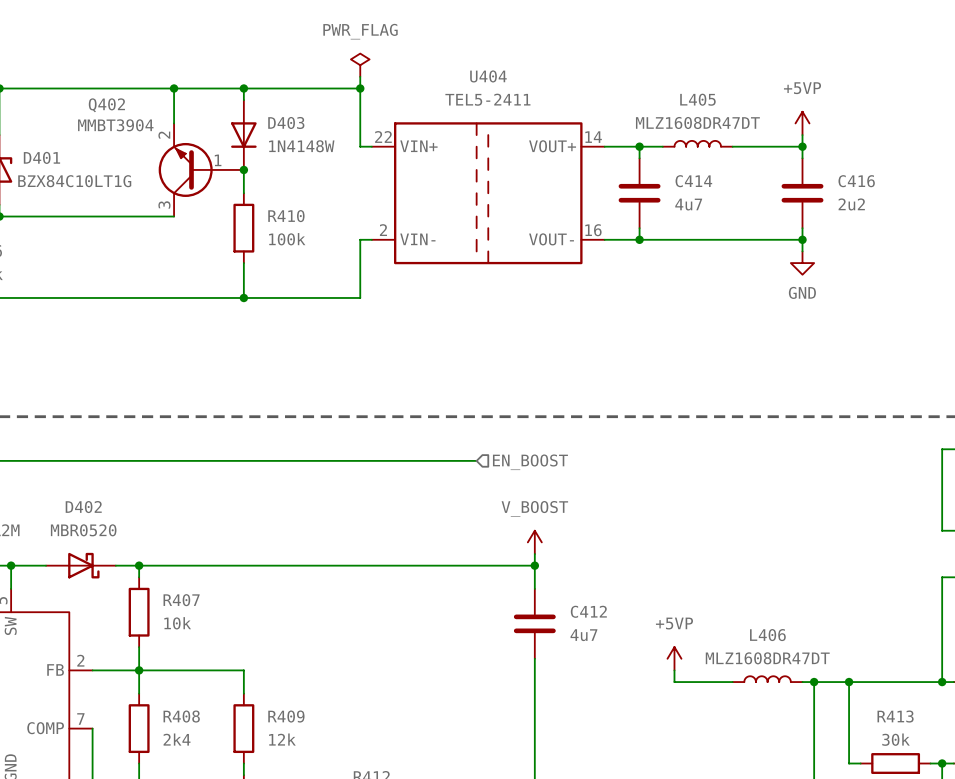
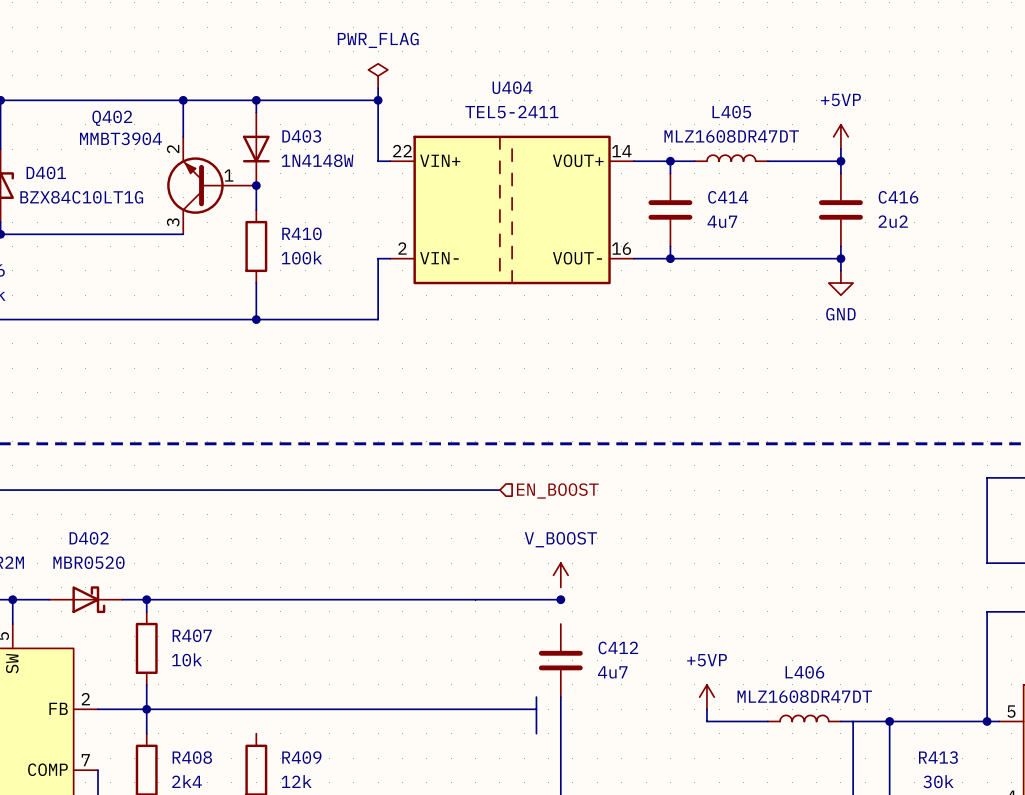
wire: (534, 554) (534, 588) -> (536, 697) (536, 733)
wire: (243, 670) (243, 693) -> (256, 709) (536, 709)
junction: (814, 682) -> none

